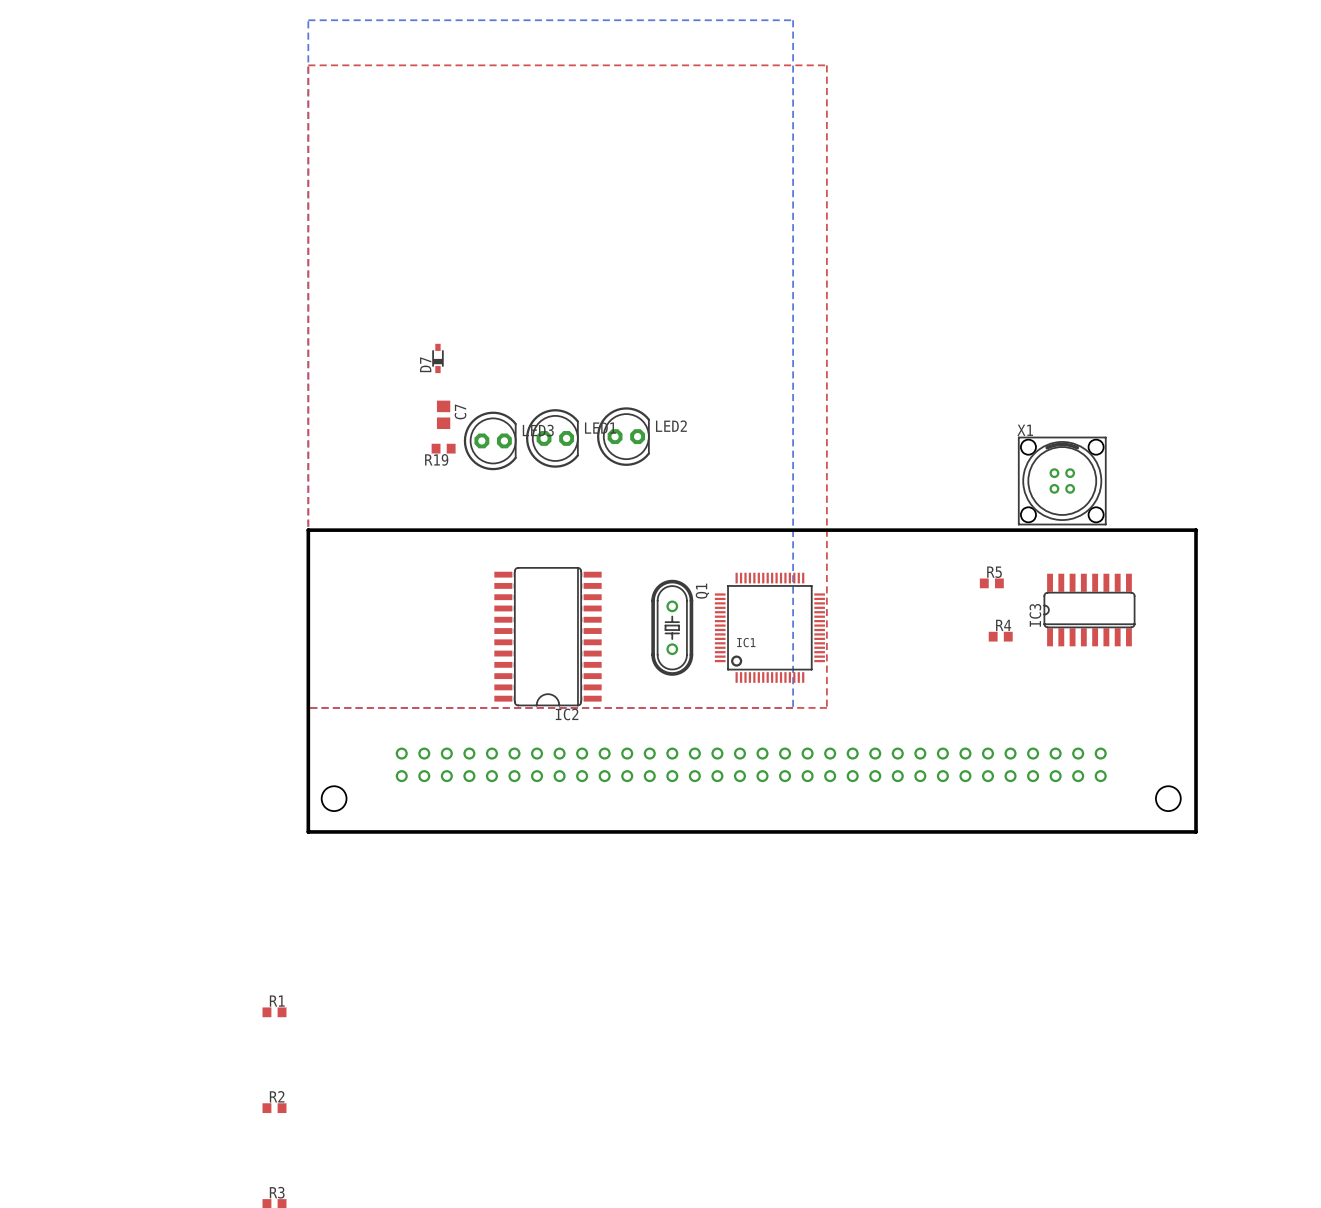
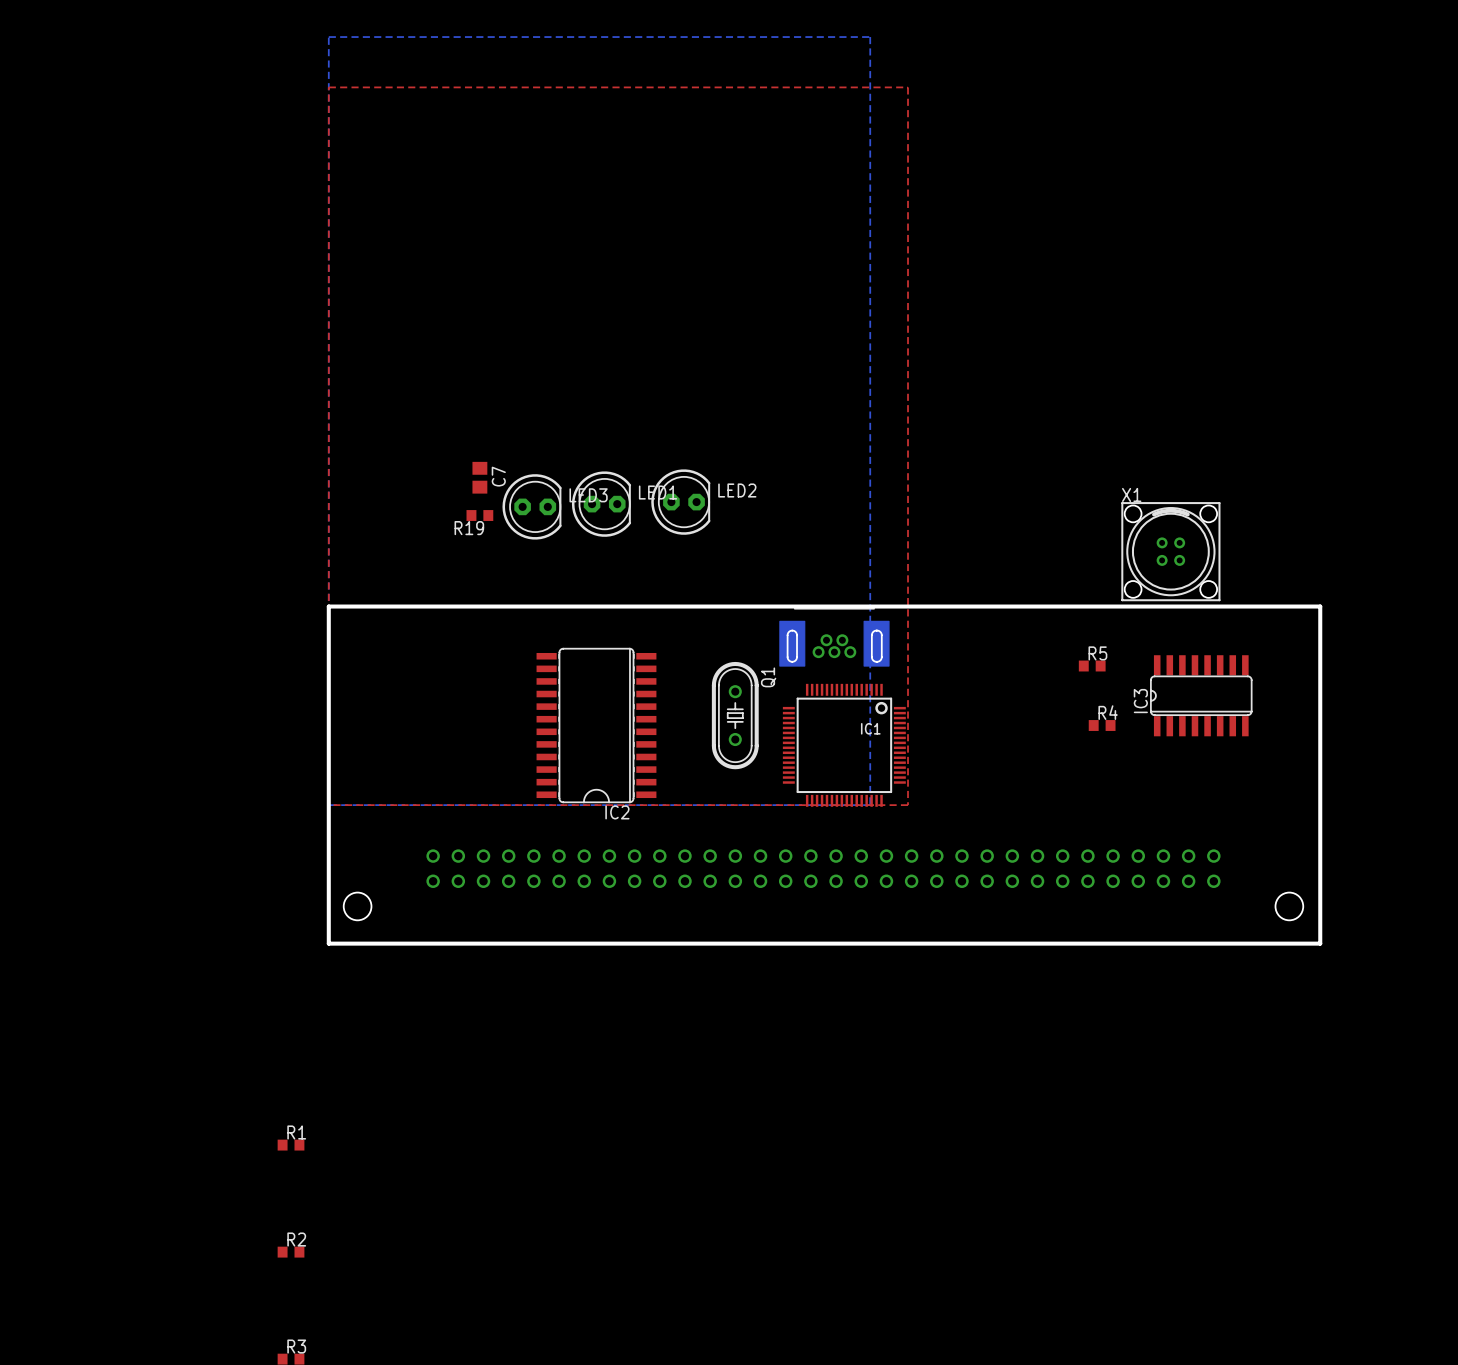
D7: (437, 358) -> none
part: none -> (834, 637)
IC1 rotation: 0° (769, 627) -> 180° (844, 745)

